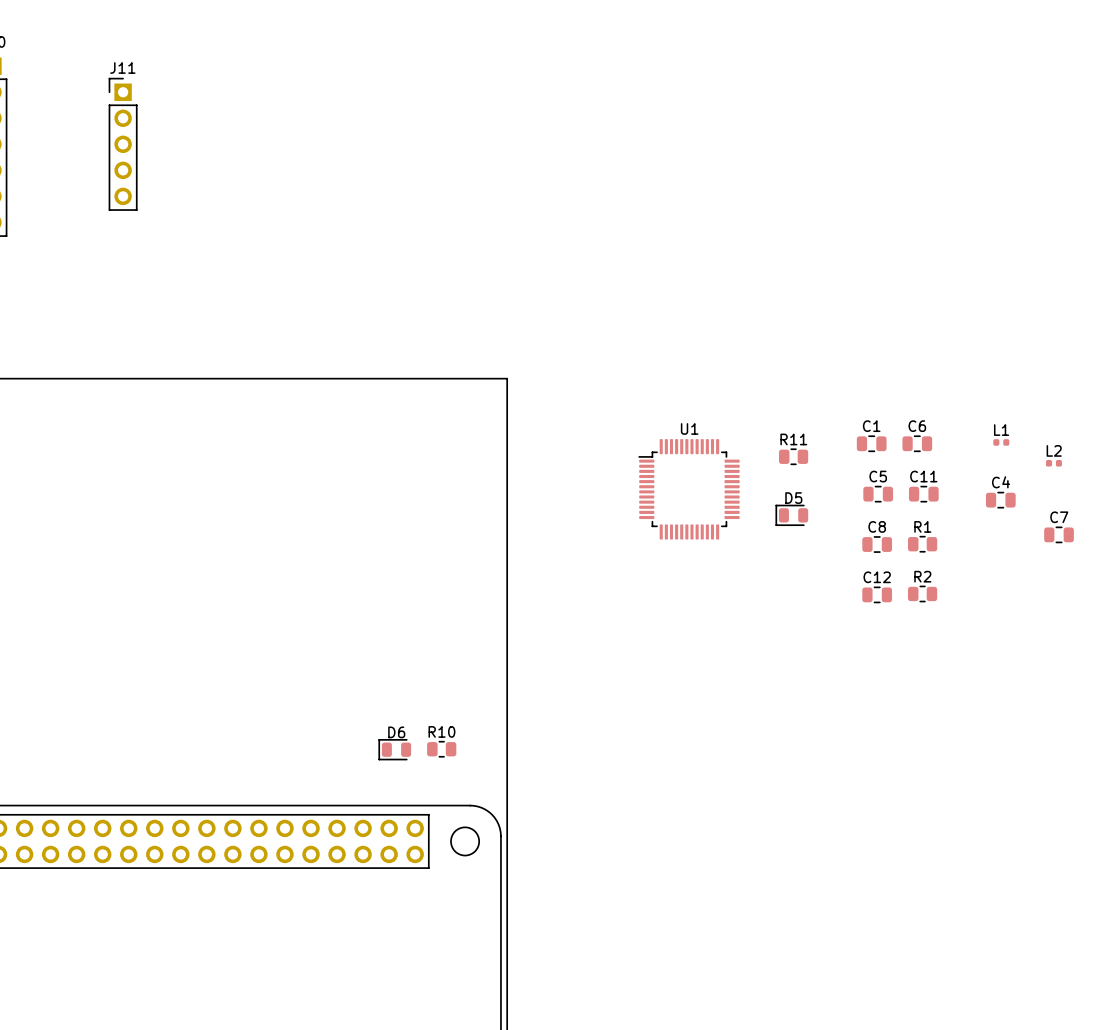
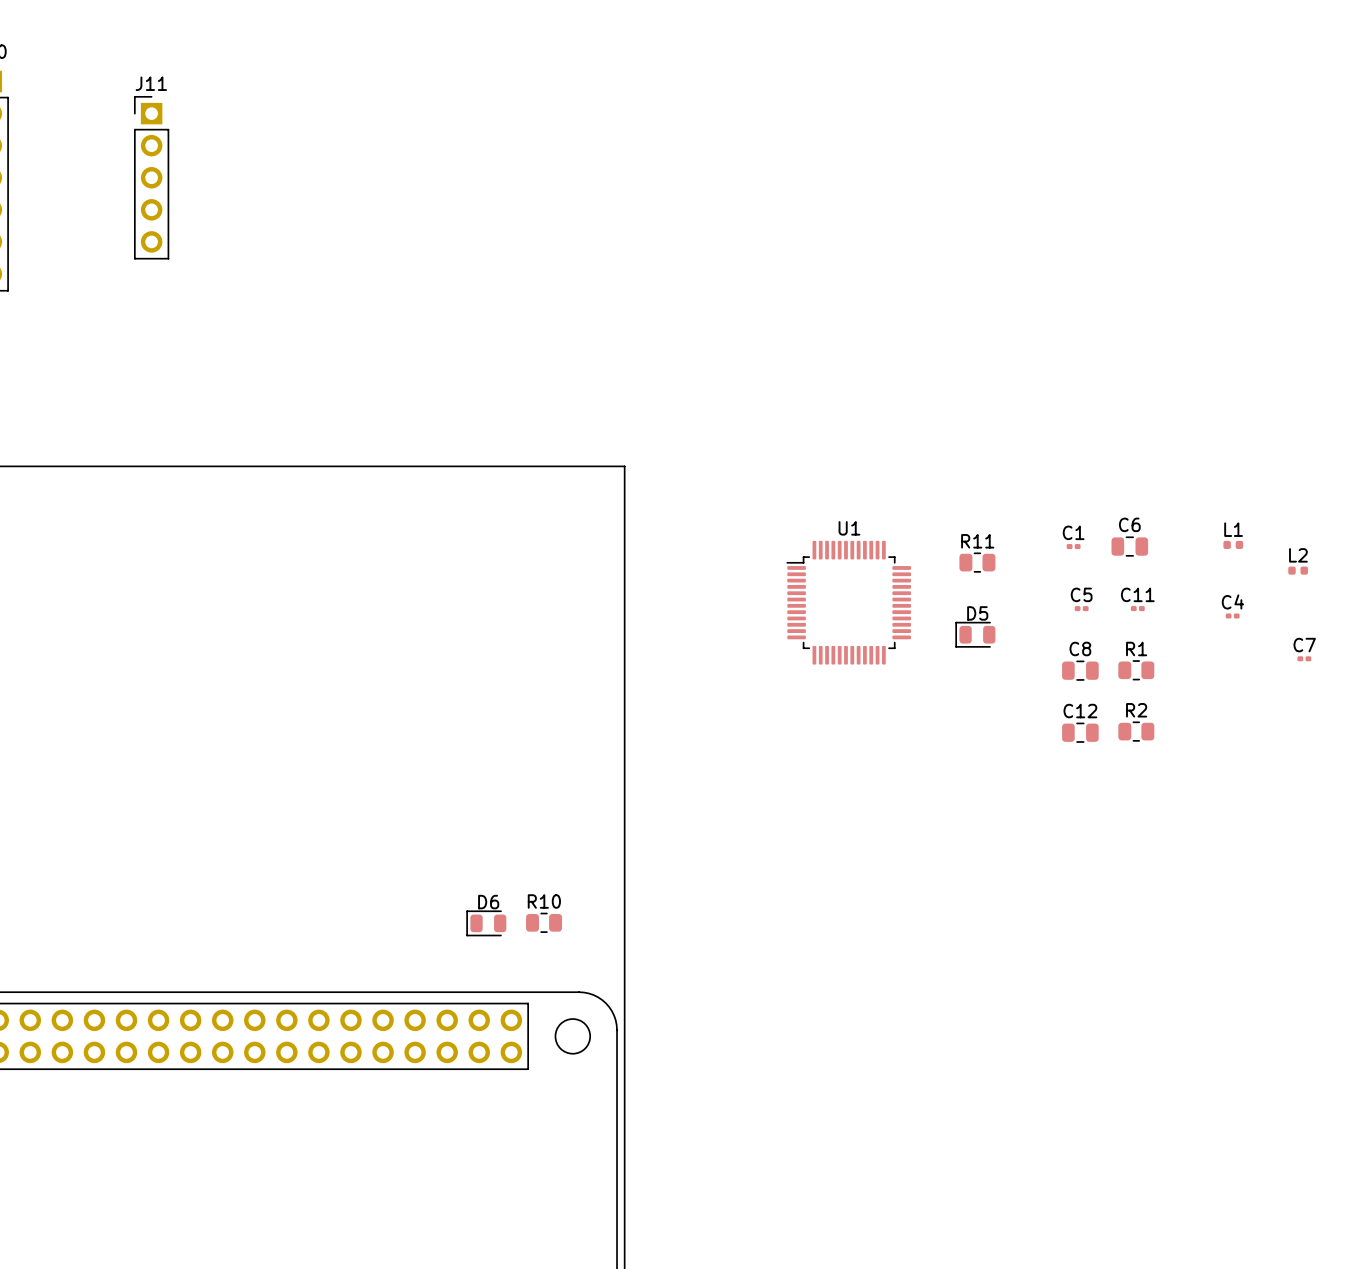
C1 footprint: [856, 435, 887, 452] -> [1066, 544, 1081, 550]
C5 footprint: [863, 485, 894, 503] -> [1074, 606, 1089, 612]
C11 footprint: [908, 485, 939, 503] -> [1130, 606, 1145, 612]
C4 footprint: [985, 491, 1016, 509] -> [1225, 613, 1240, 619]
C7 footprint: [1044, 526, 1074, 544] -> [1297, 656, 1312, 662]

